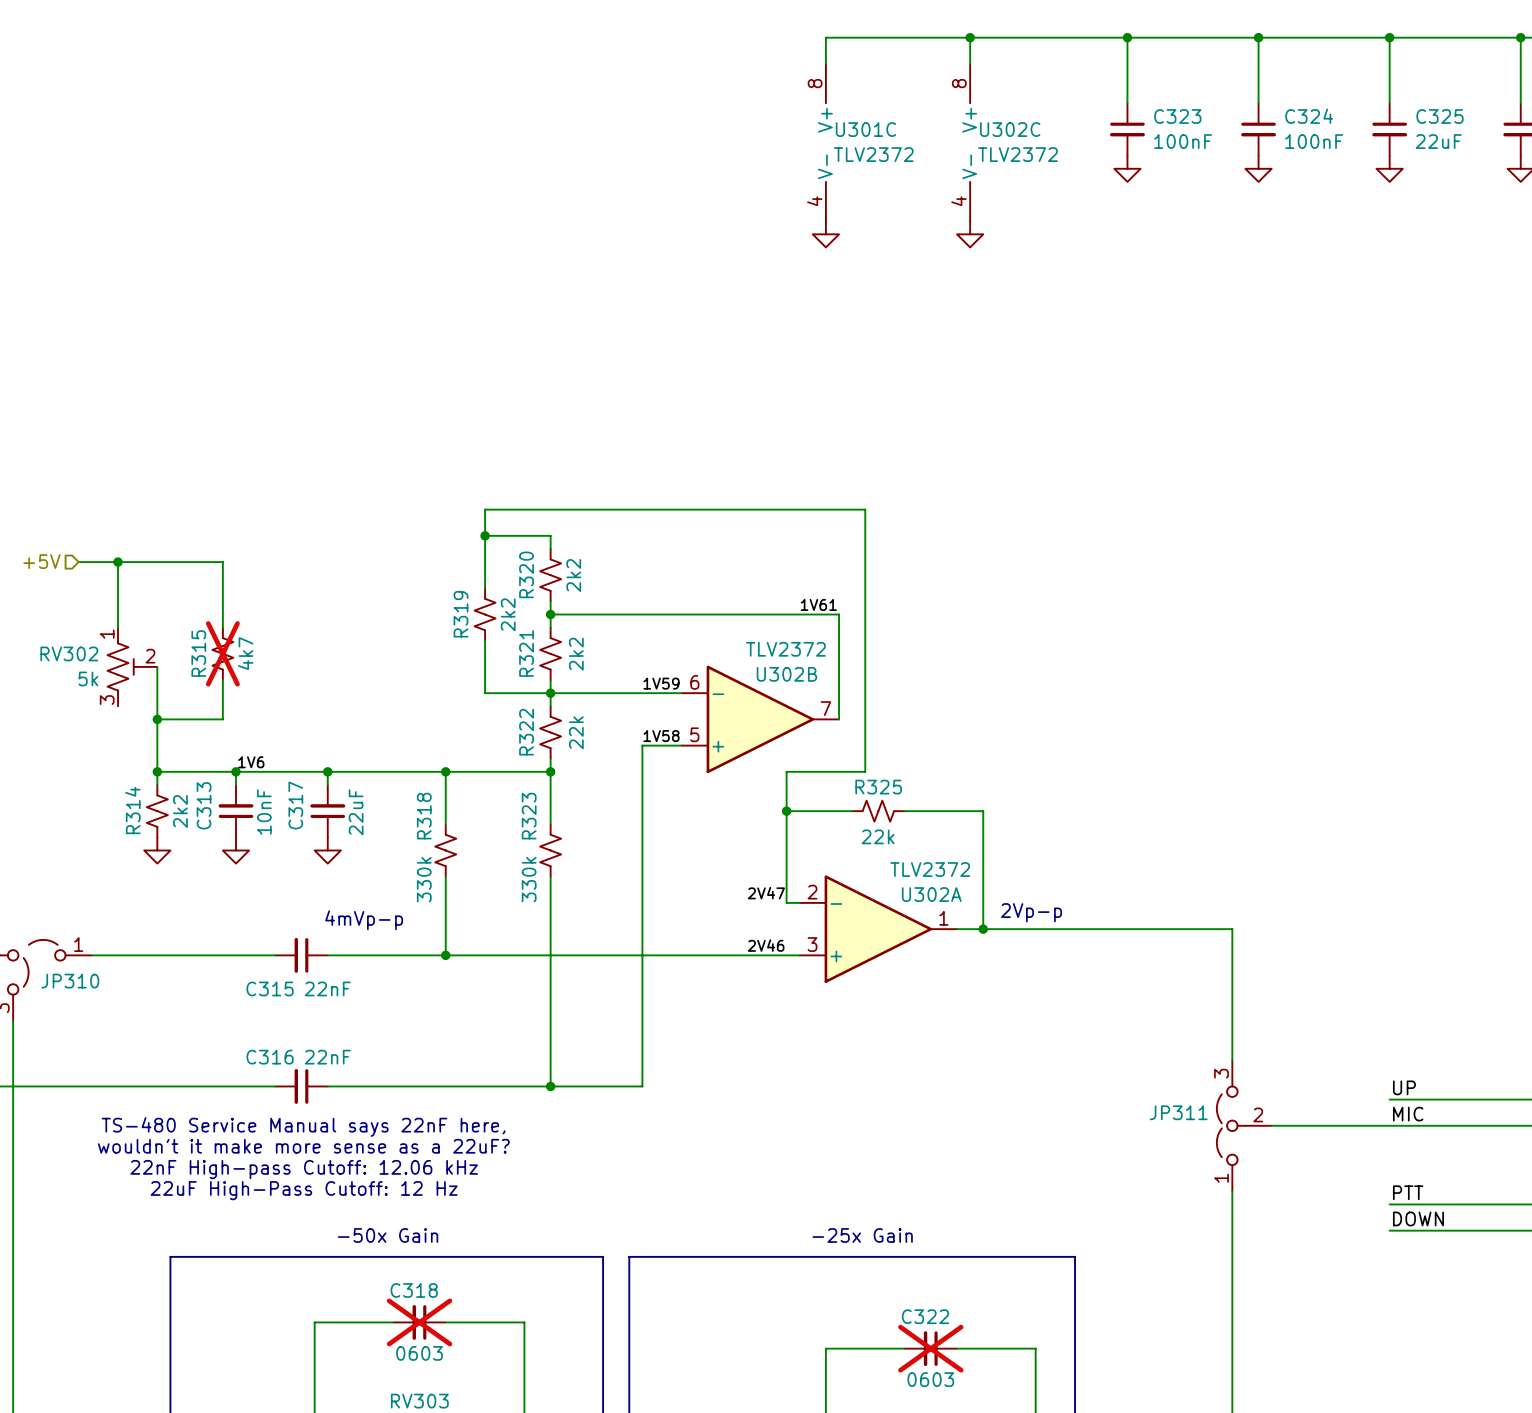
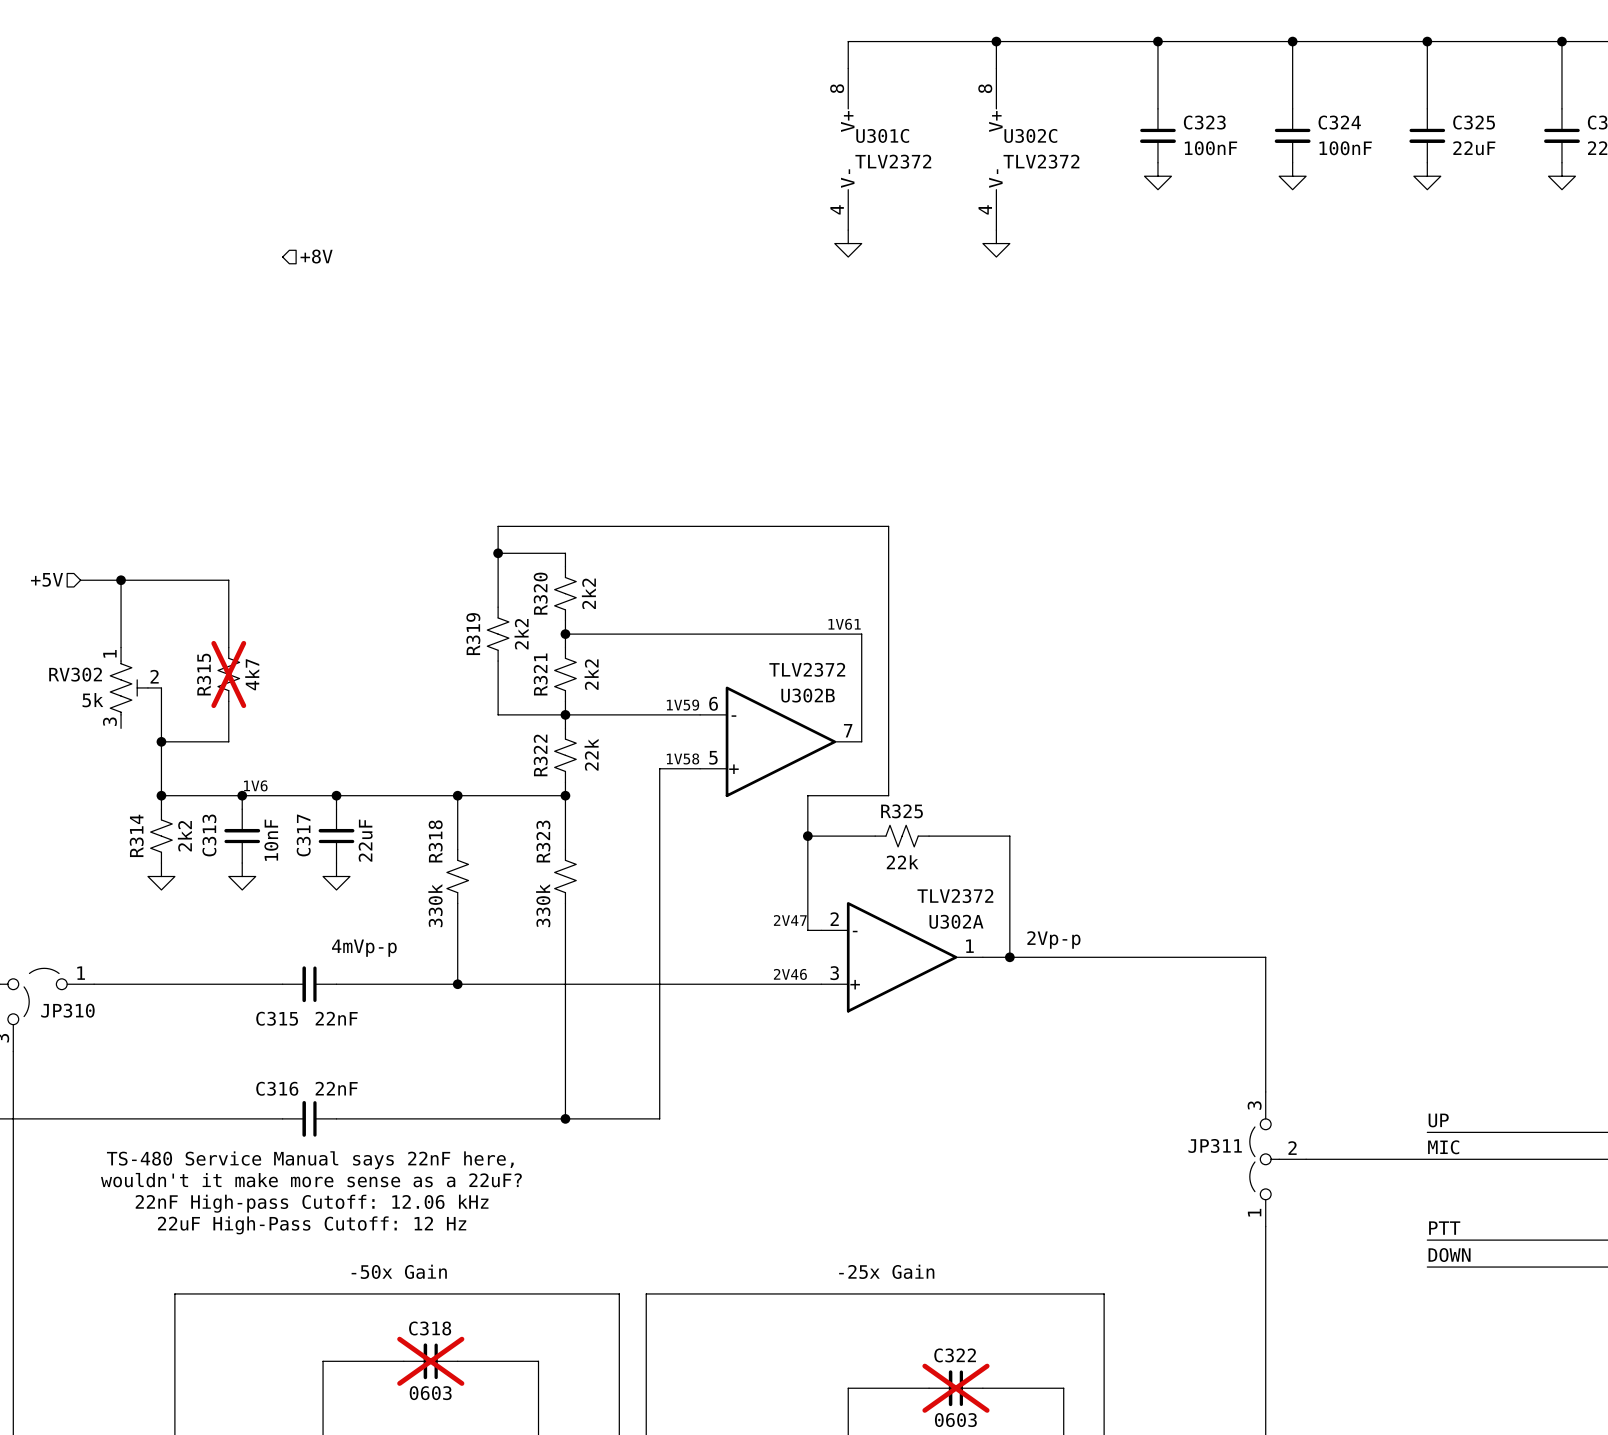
hierarchical label: none -> +8V (316, 256)

